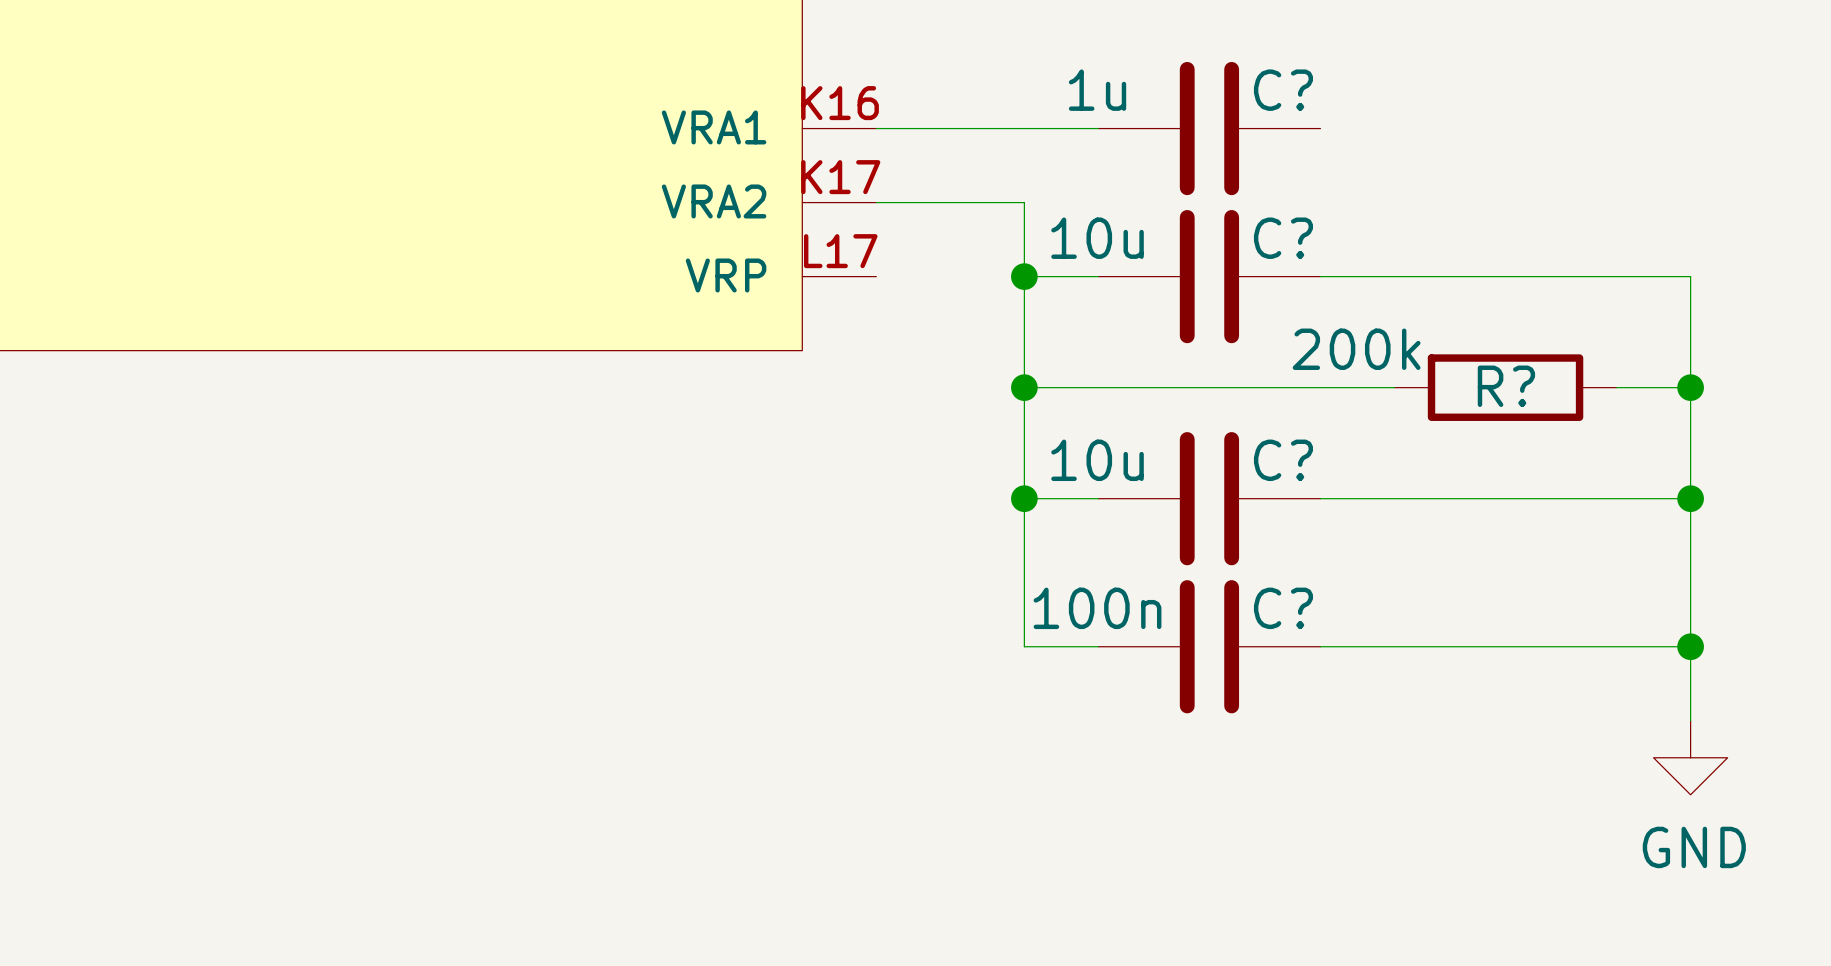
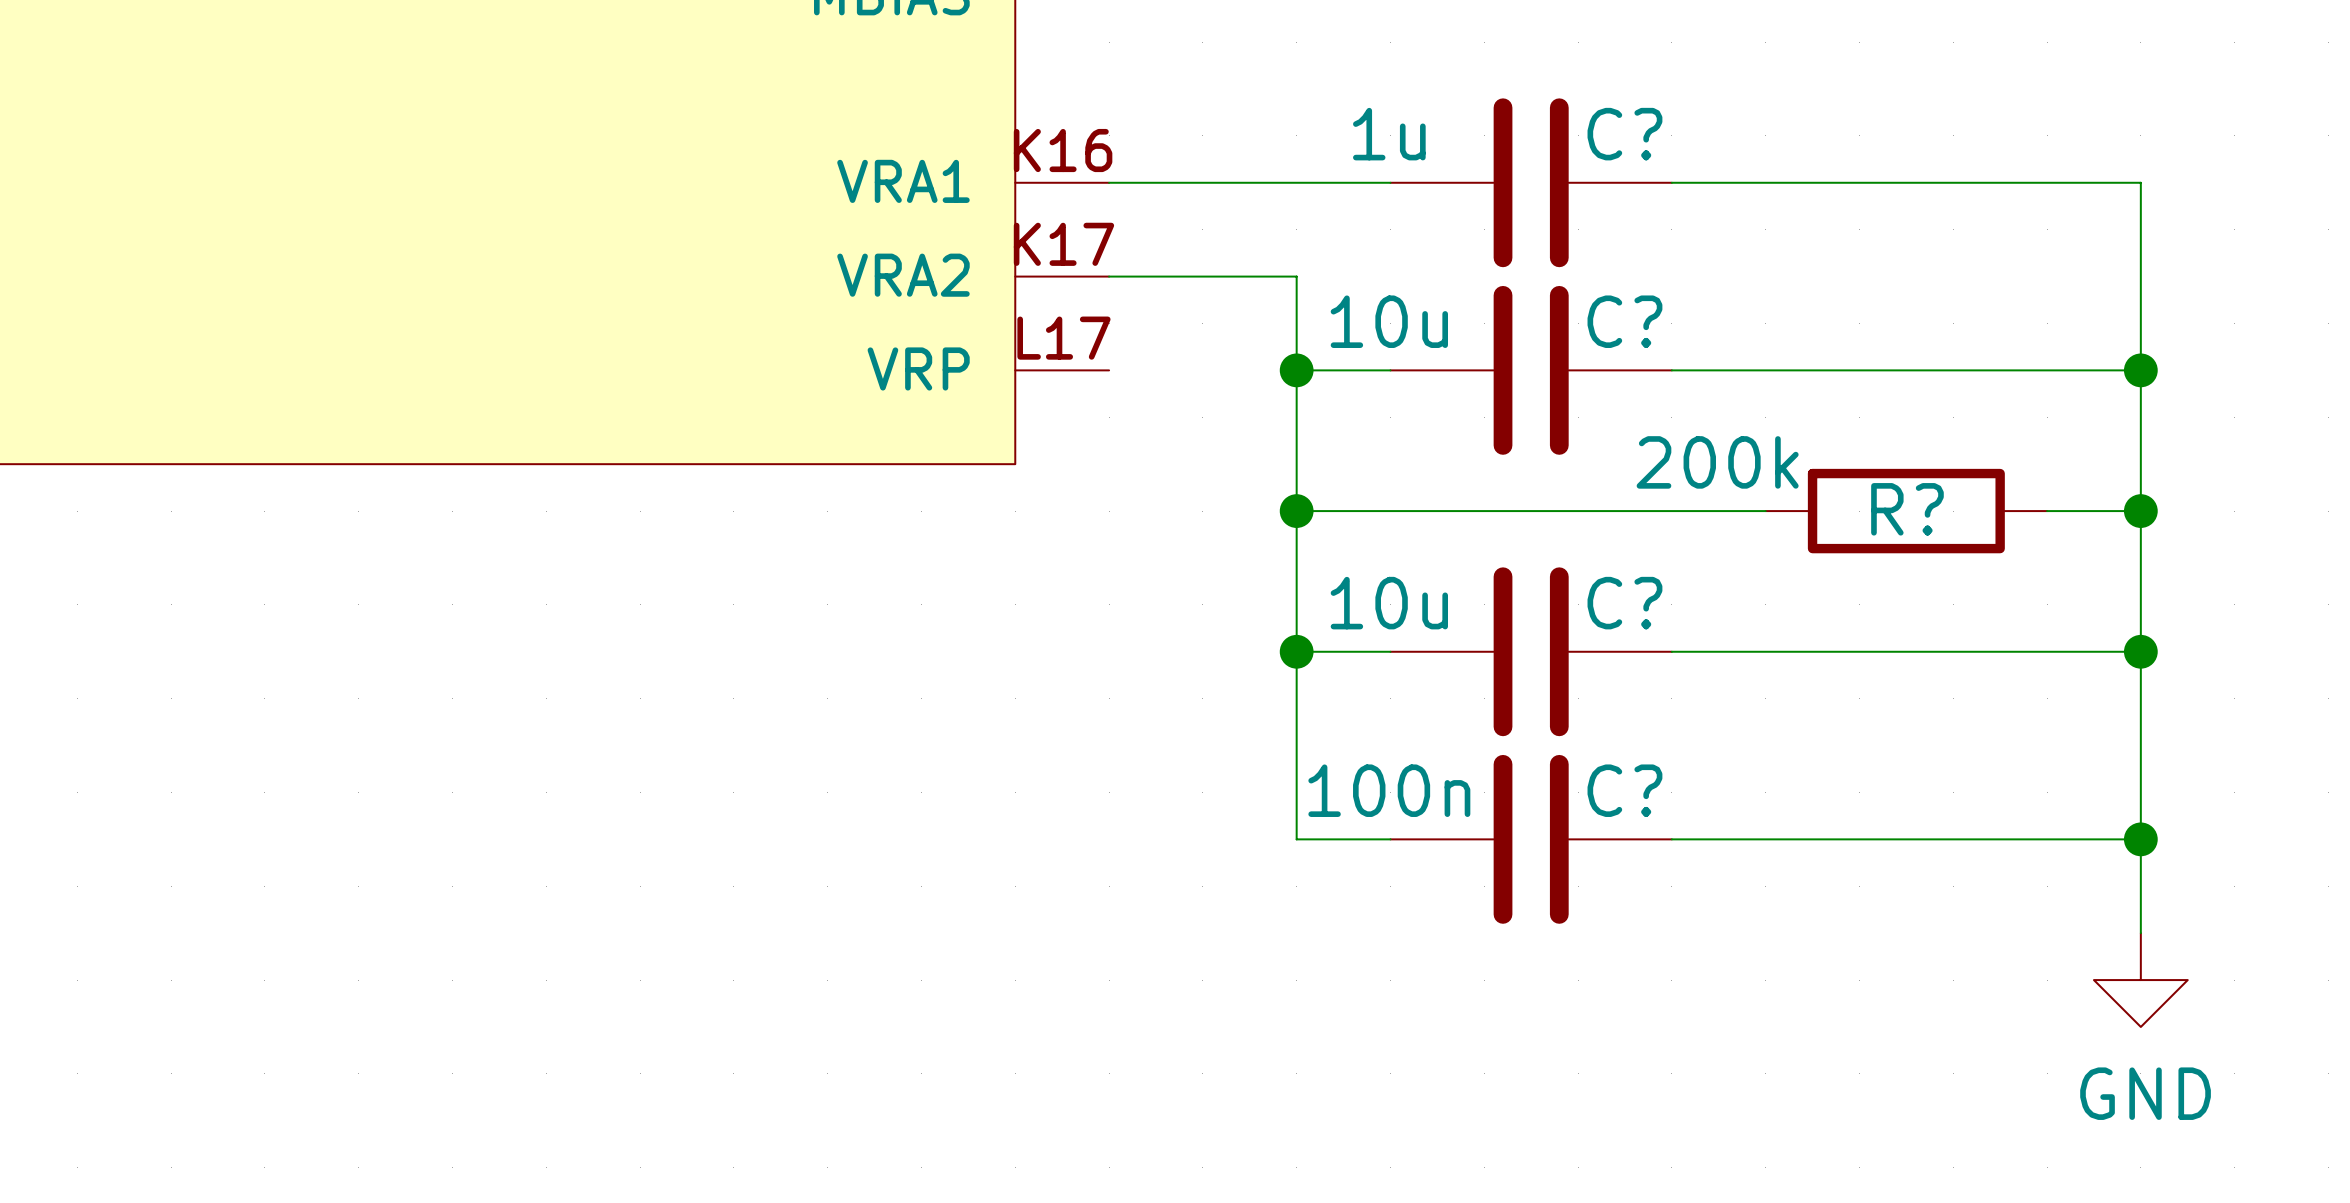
wire: none -> (1671, 182) (2140, 182) (2140, 370)
junction: none -> (2140, 370)

